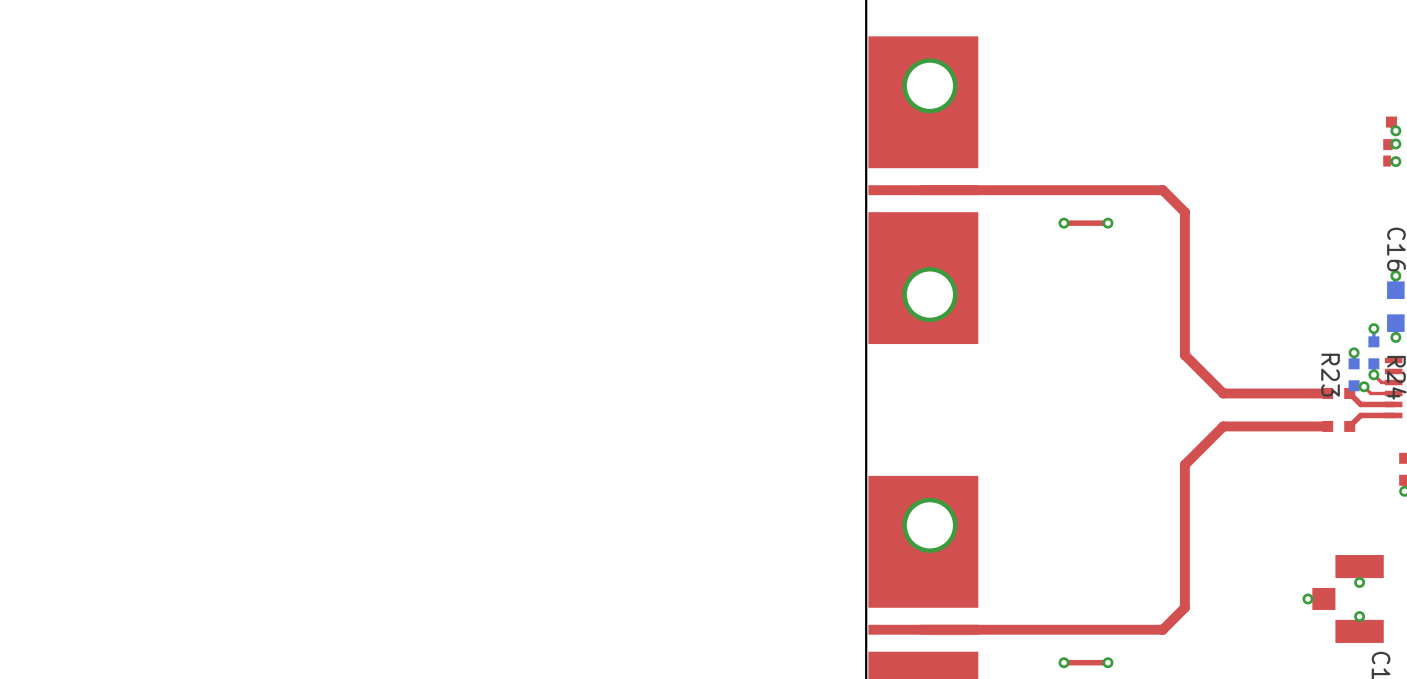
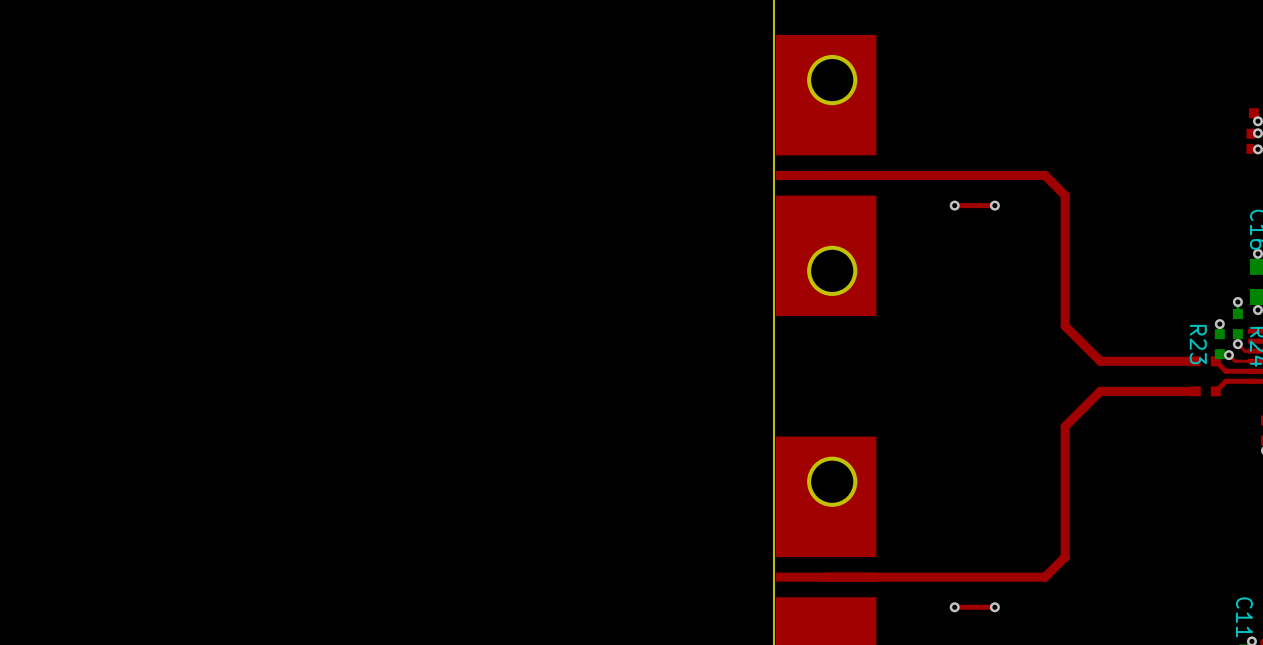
via: (1359, 582) -> none
via: (1307, 598) -> none
part: (1348, 598) -> none
via: (1359, 616) -> none

